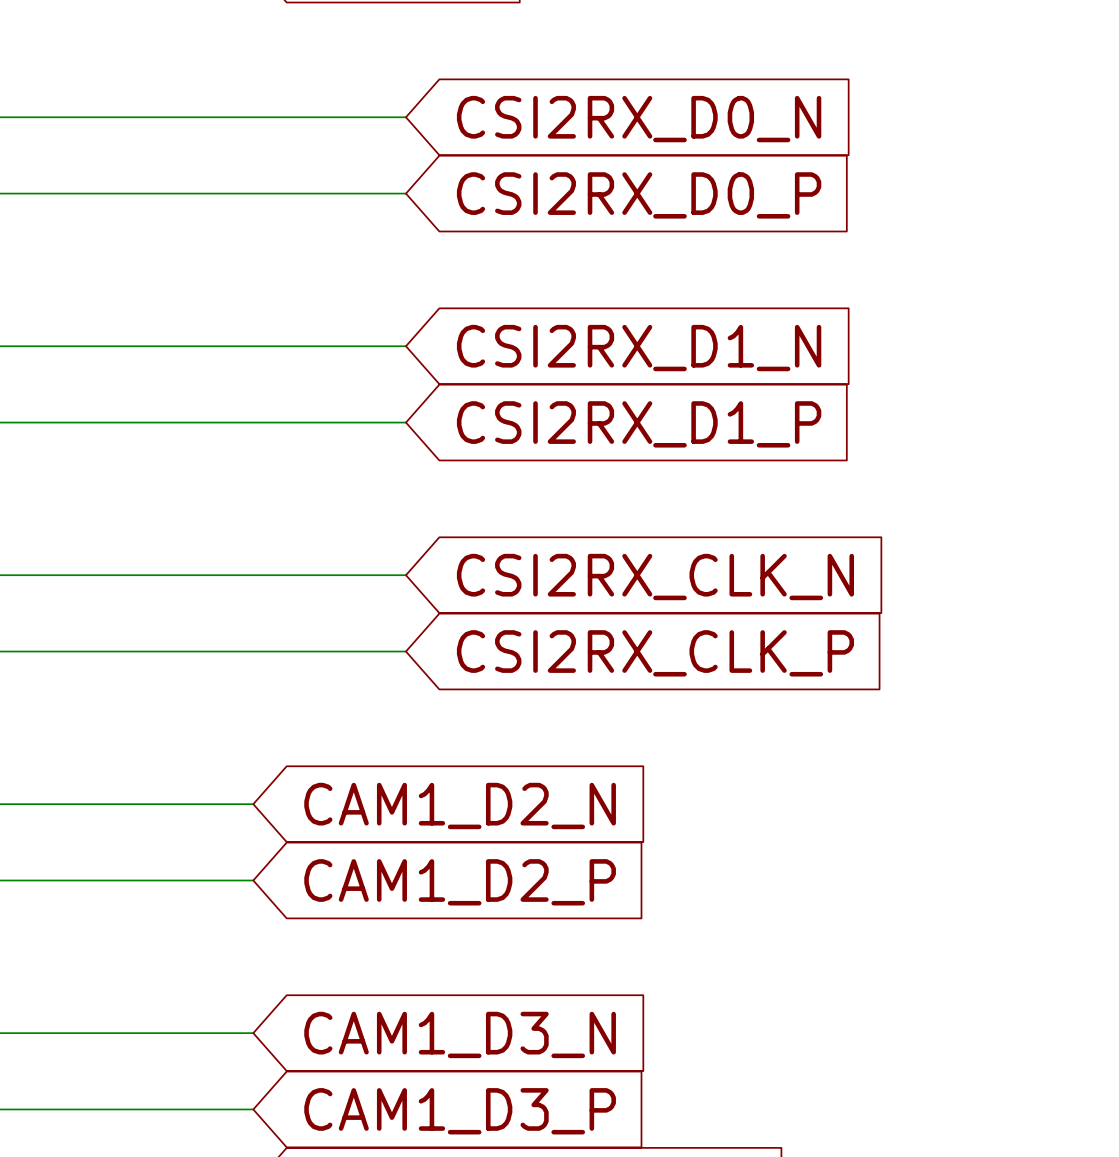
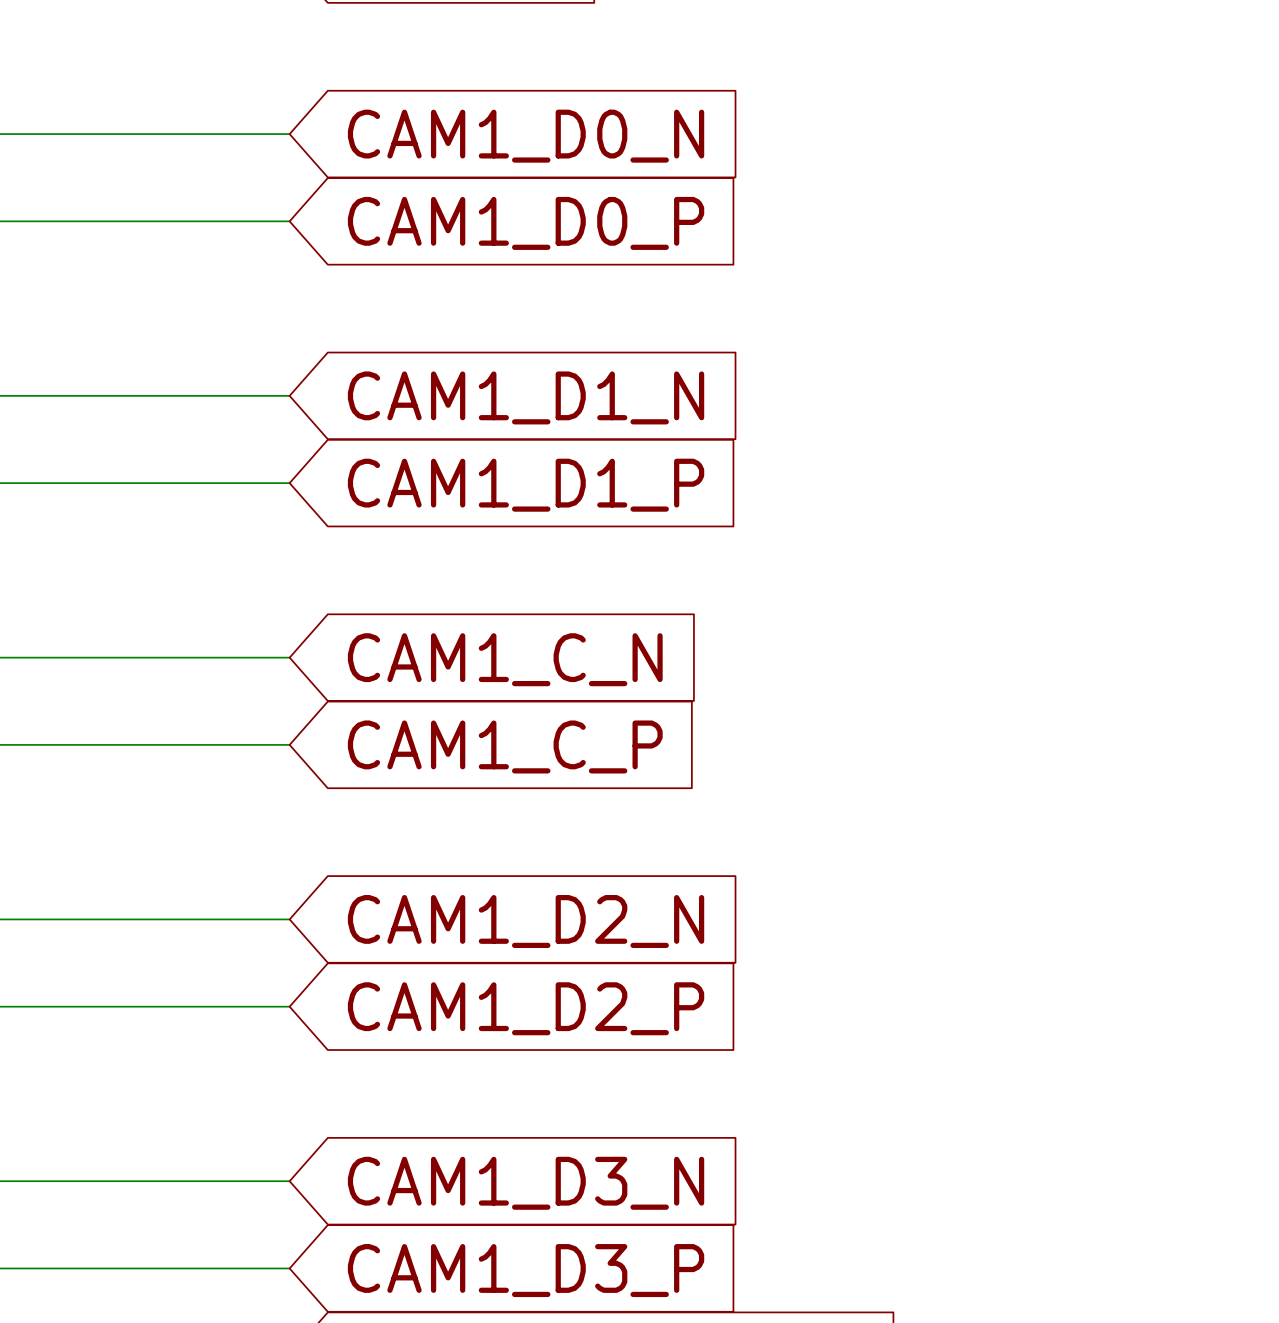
wire: (253, 117) (405, 117) -> none
global label: none -> CAM1_D0_N (526, 136)
global label: CSI2RX_D0_N (639, 119) -> none
wire: (253, 193) (405, 193) -> none
global label: none -> CAM1_D0_P (526, 223)
global label: CSI2RX_D0_P (639, 195) -> none
wire: (253, 346) (405, 346) -> none
global label: none -> CAM1_D1_N (526, 397)
global label: CSI2RX_D1_N (639, 348) -> none
wire: (253, 422) (405, 422) -> none
global label: none -> CAM1_D1_P (526, 485)
global label: CSI2RX_D1_P (639, 424) -> none
wire: (253, 575) (405, 575) -> none
global label: none -> CAM1_C_N (505, 659)
global label: CSI2RX_CLK_N (655, 577) -> none
wire: (253, 651) (405, 651) -> none
global label: none -> CAM1_C_P (505, 746)
global label: CSI2RX_CLK_P (655, 653) -> none

